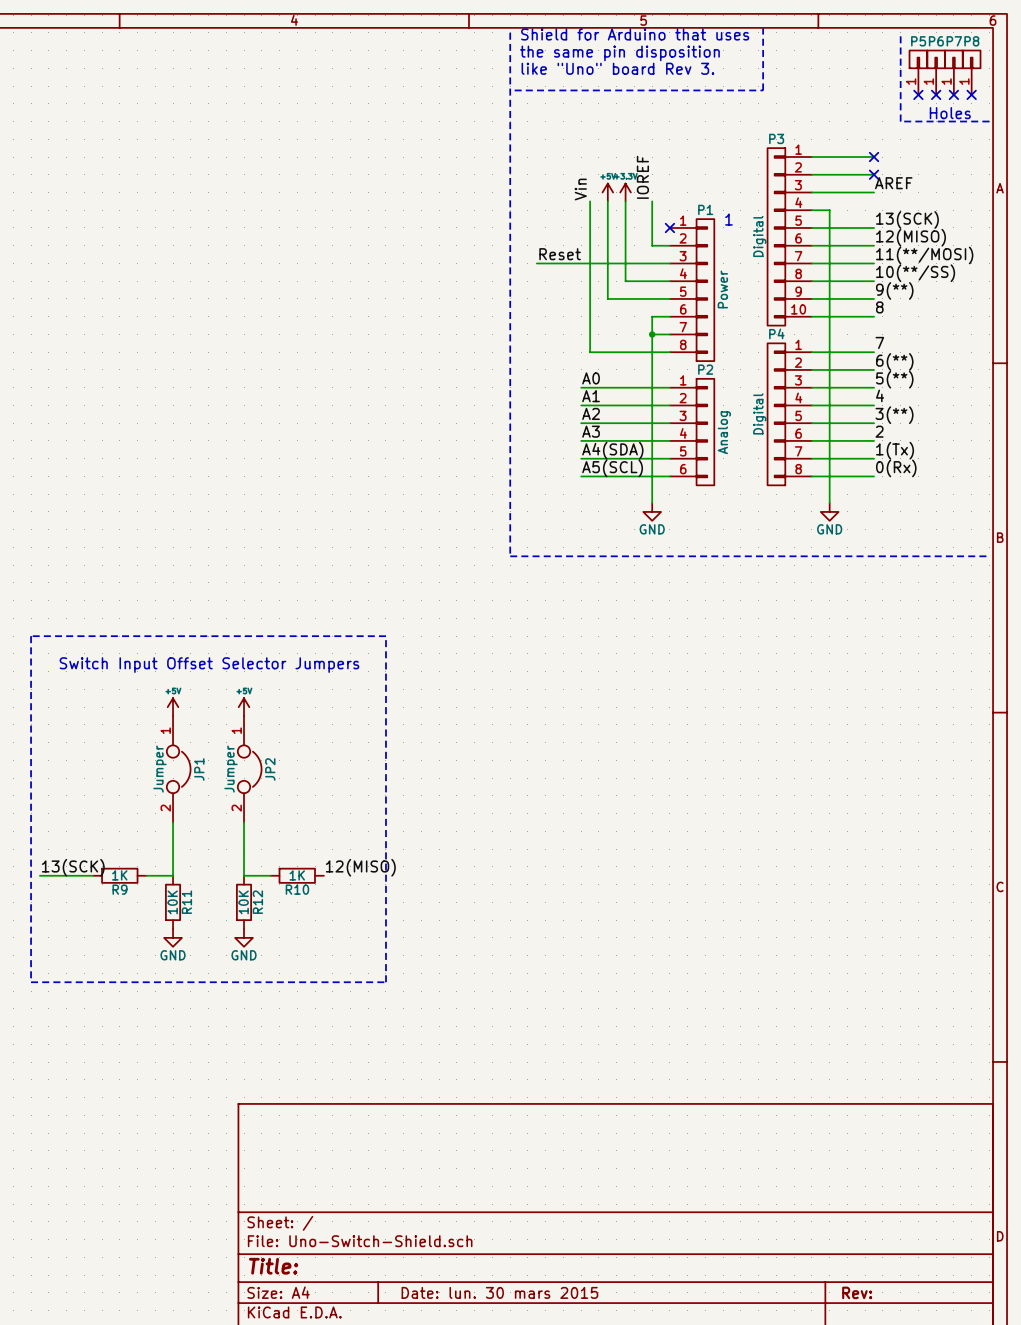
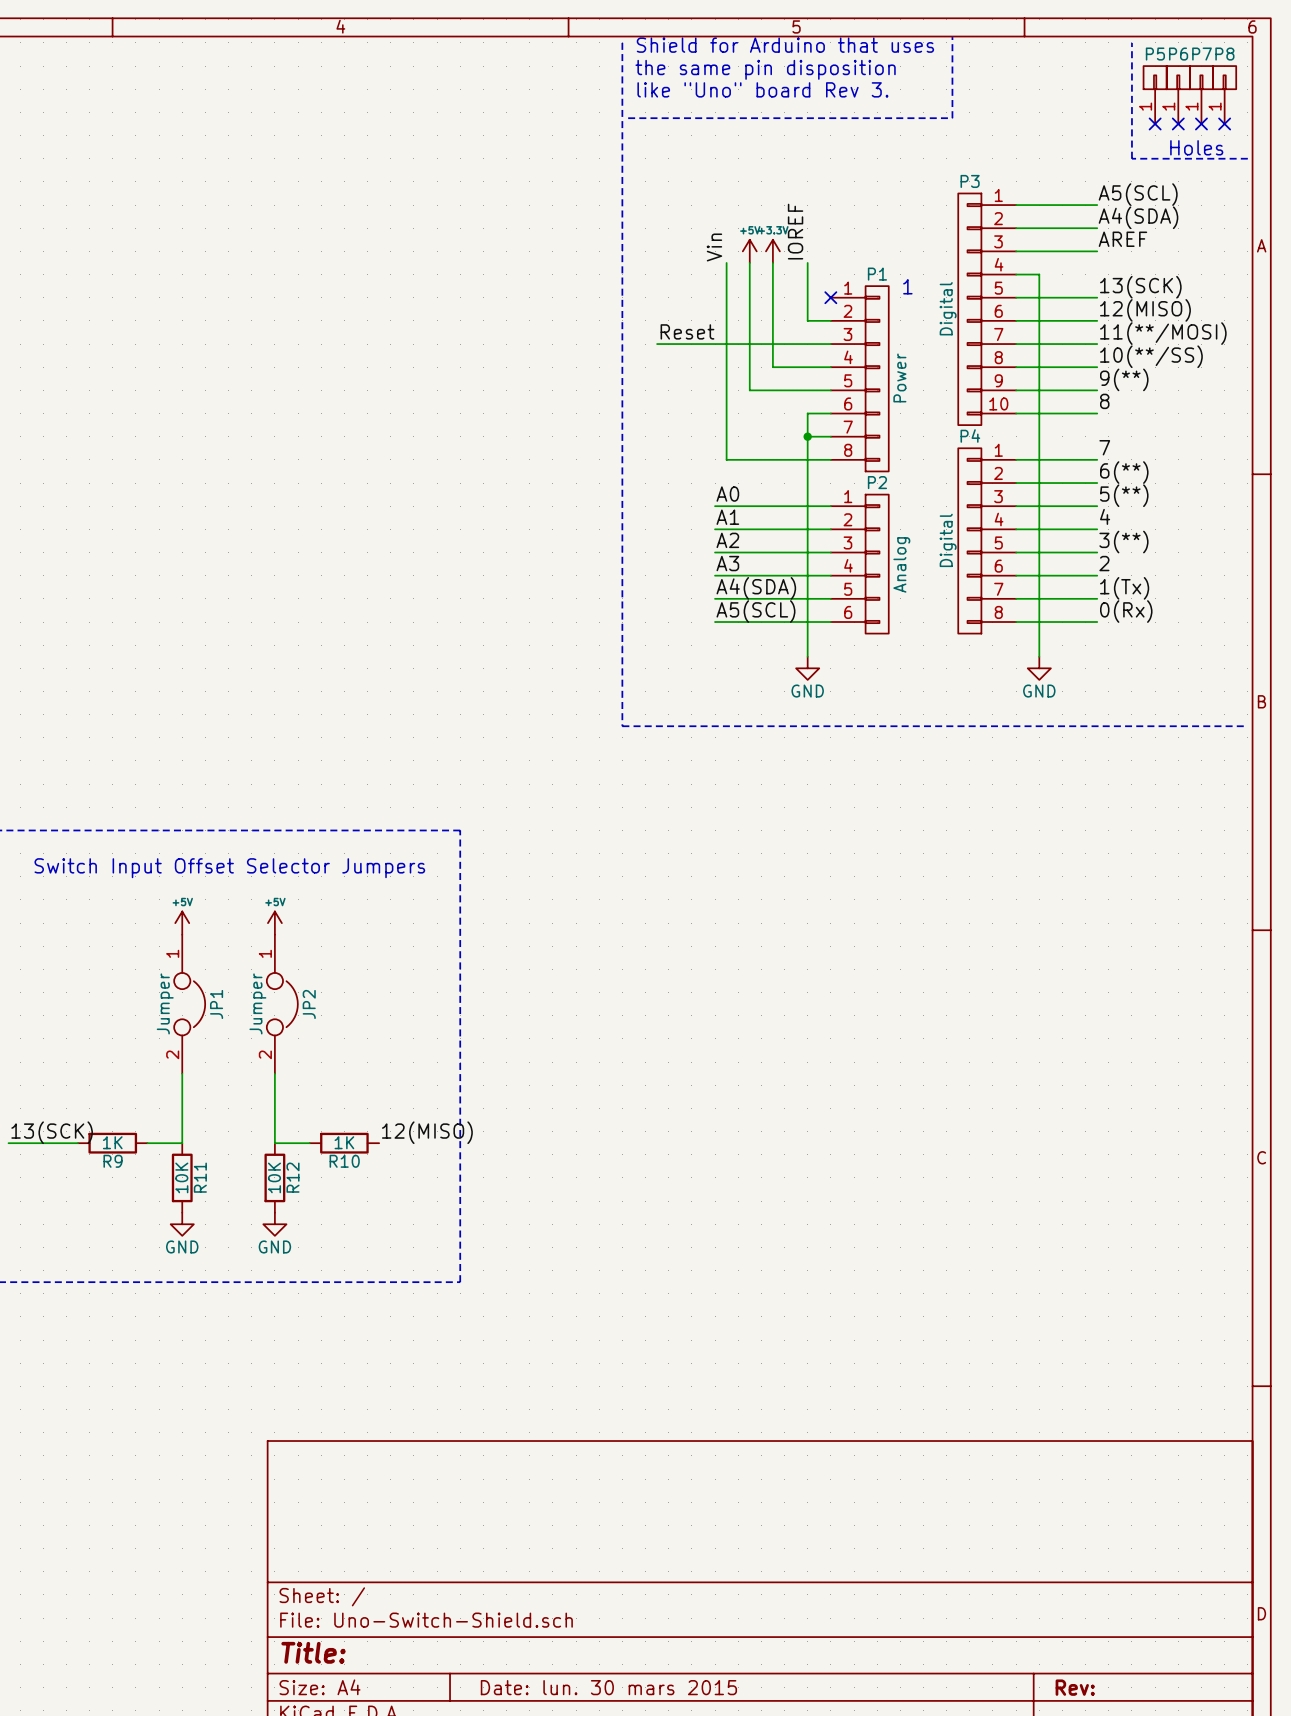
label: none -> A5(SCL) (1138, 194)
no-connect mark: (874, 157) -> none
label: none -> A4(SDA) (1138, 217)
no-connect mark: (874, 174) -> none

